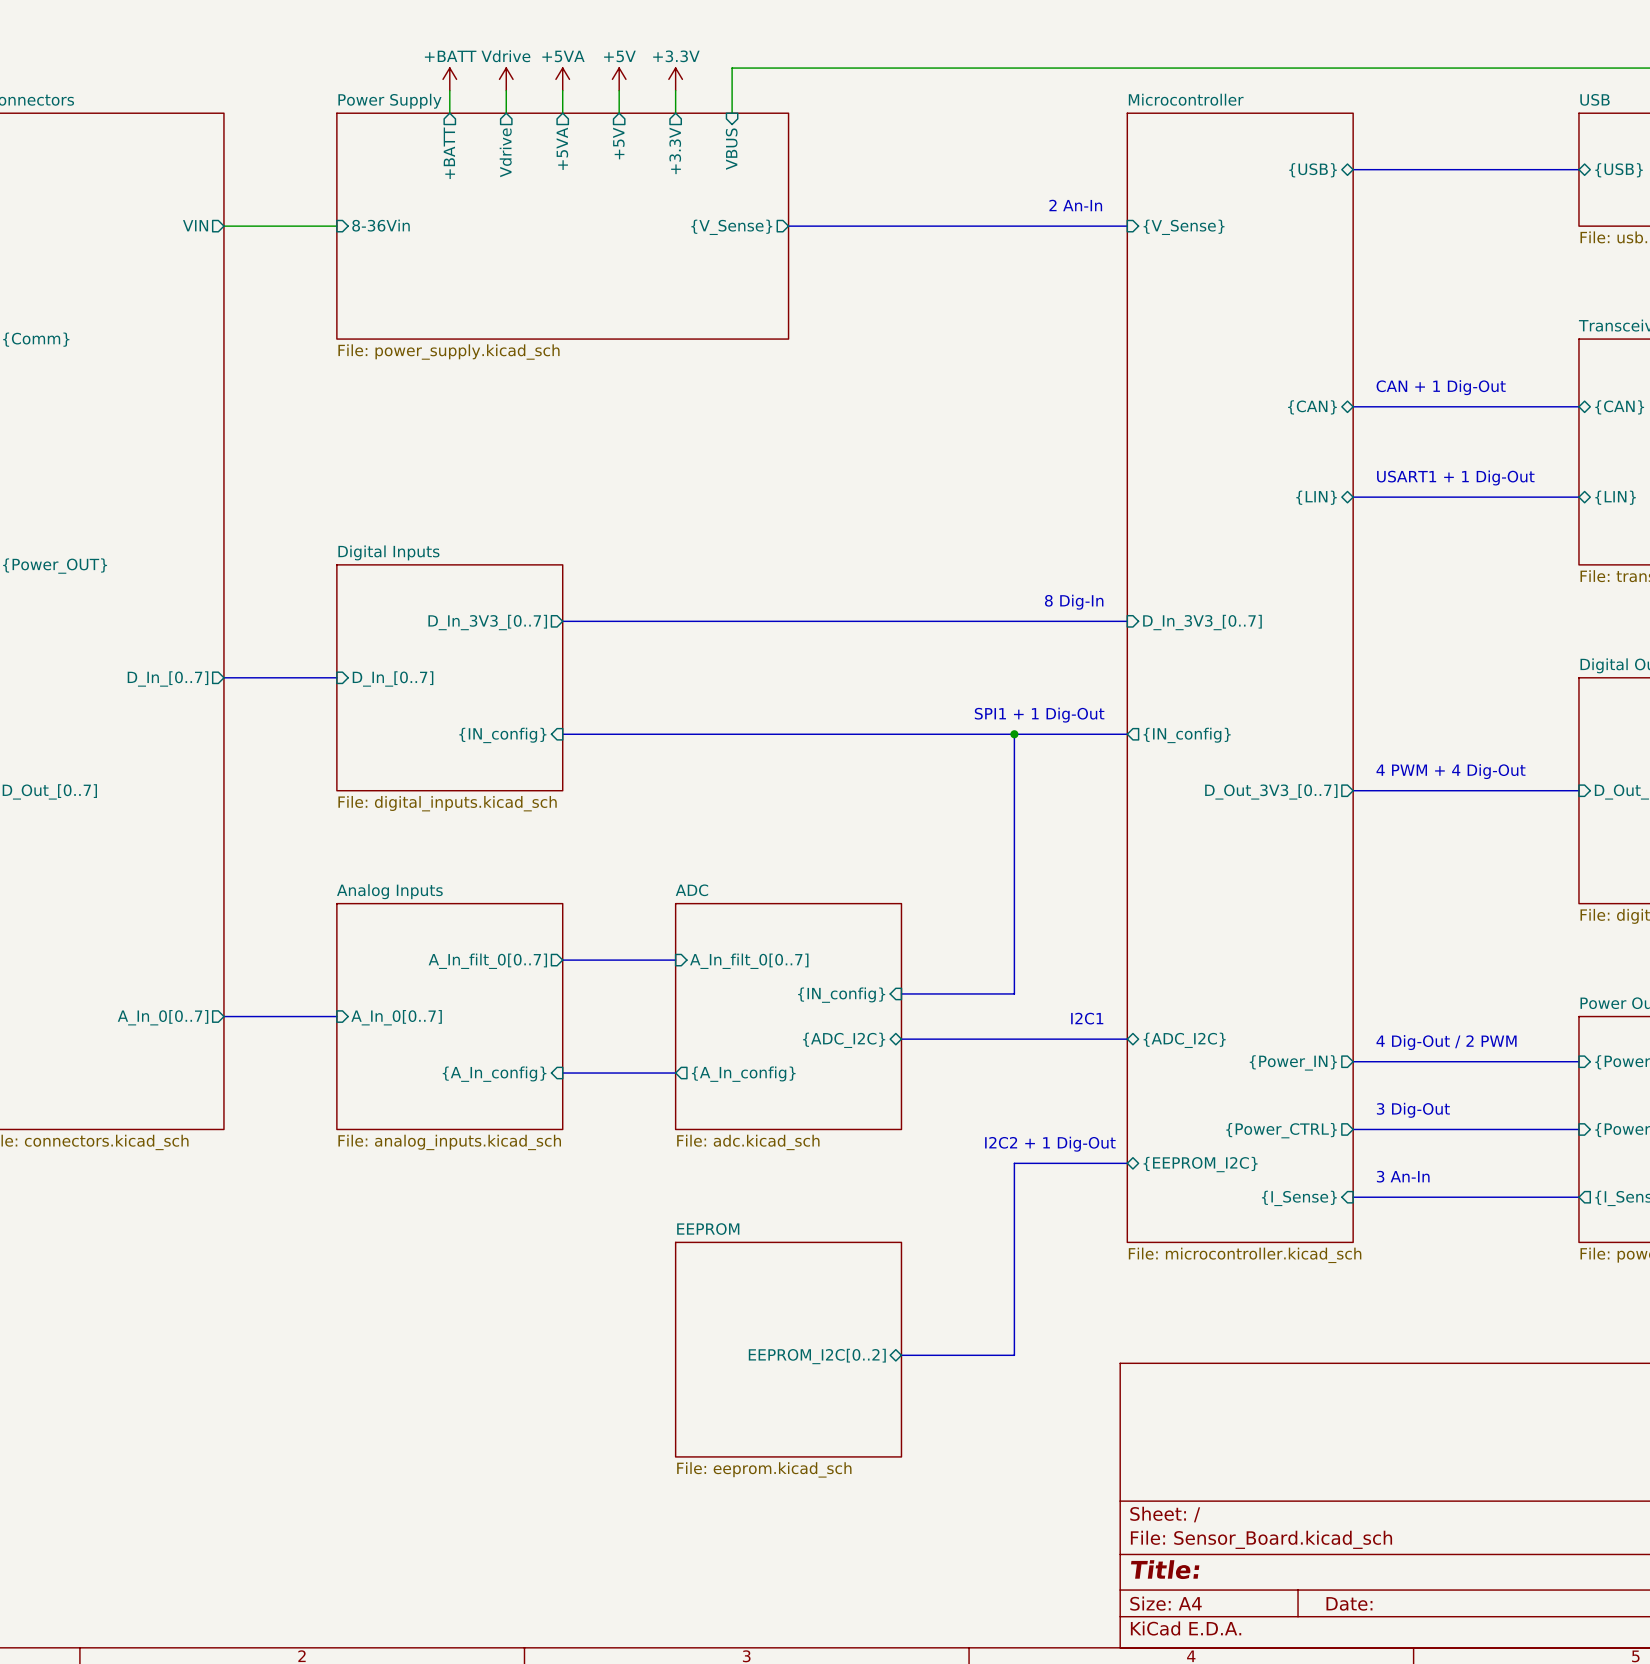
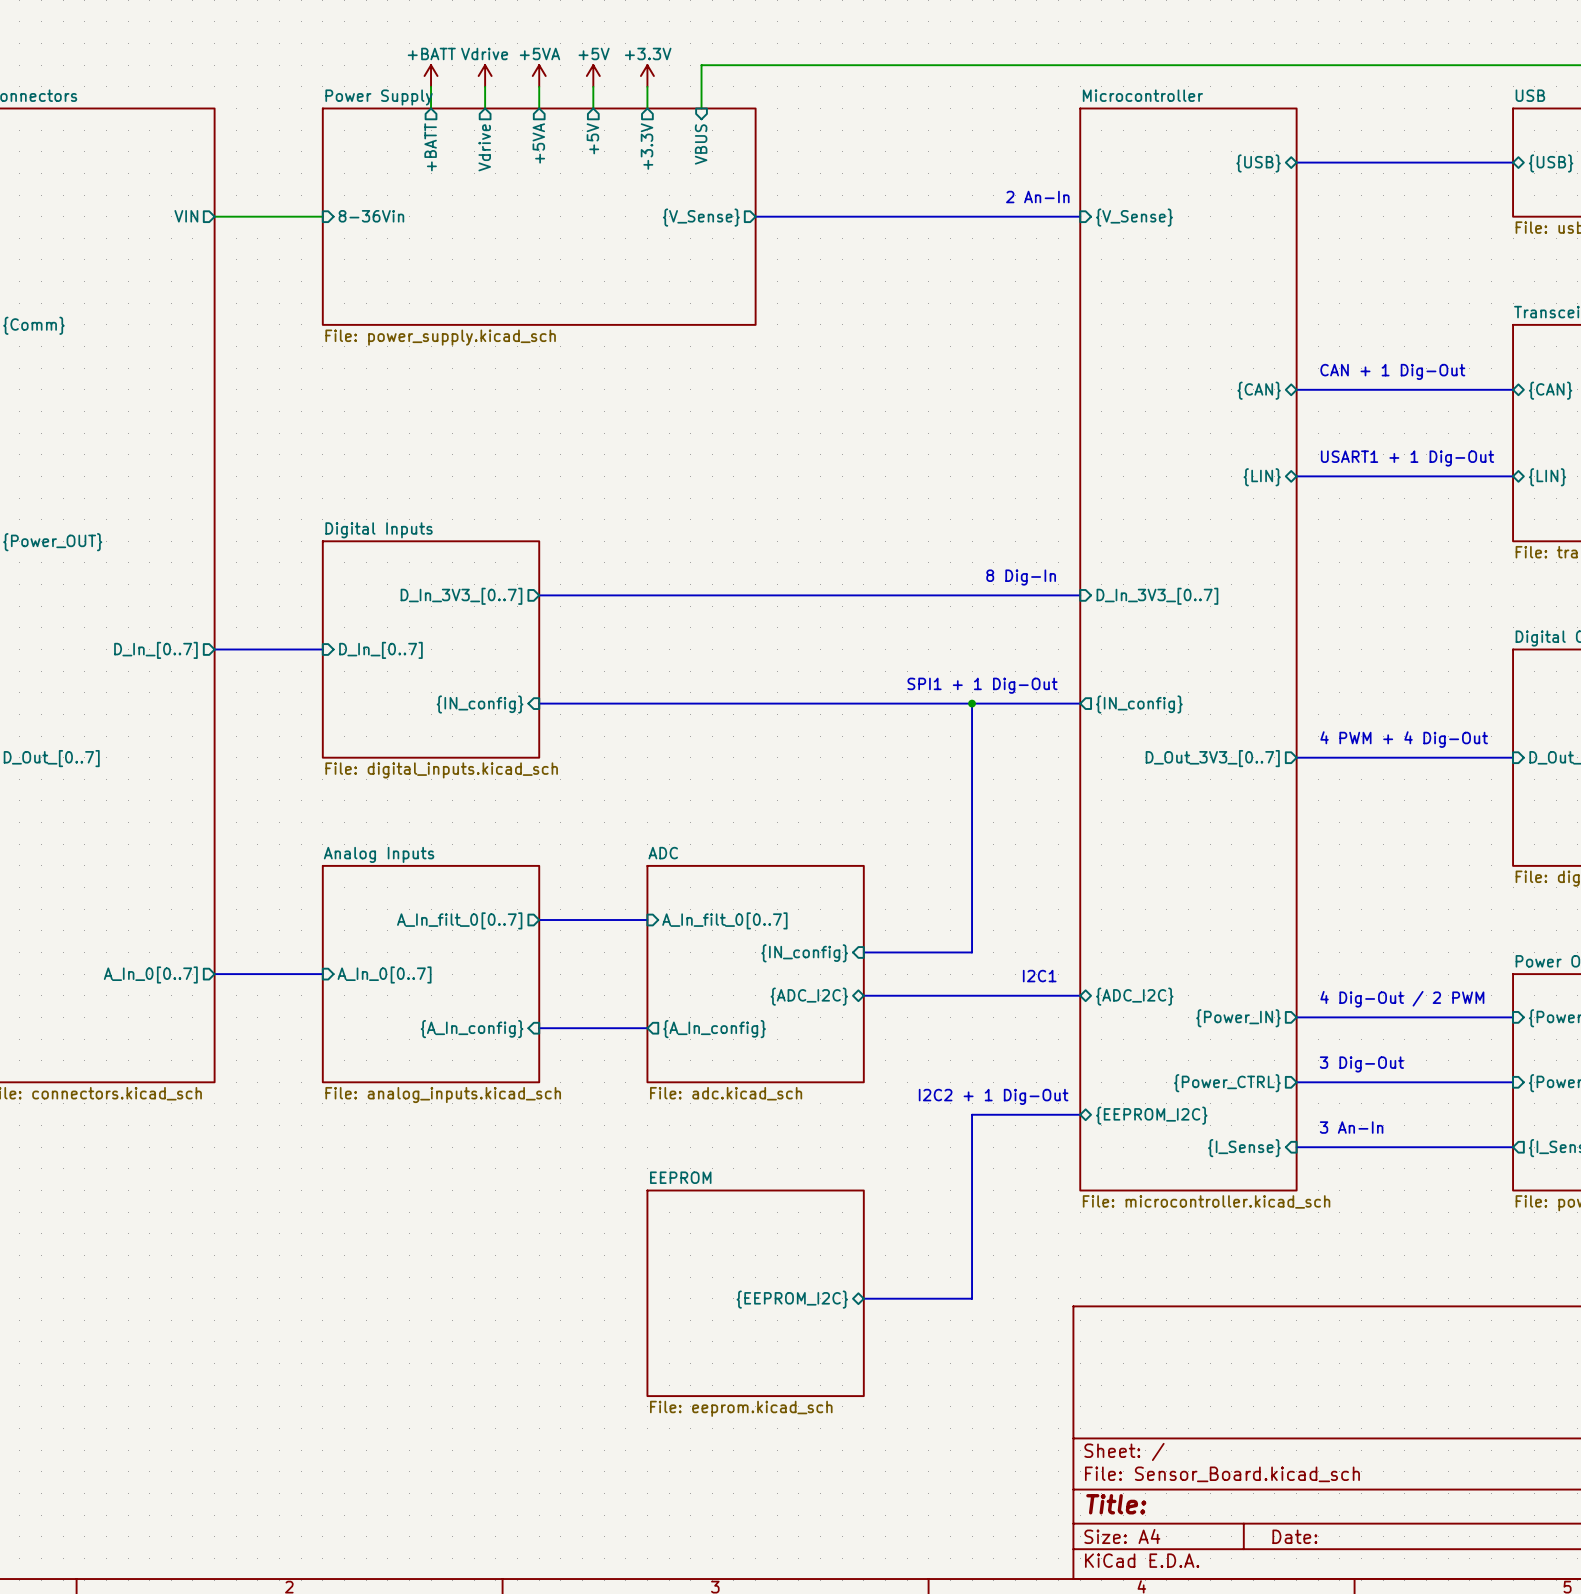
sheet pin: EEPROM_I2C[0..2] (817, 1356) -> {EEPROM_I2C} (792, 1299)

